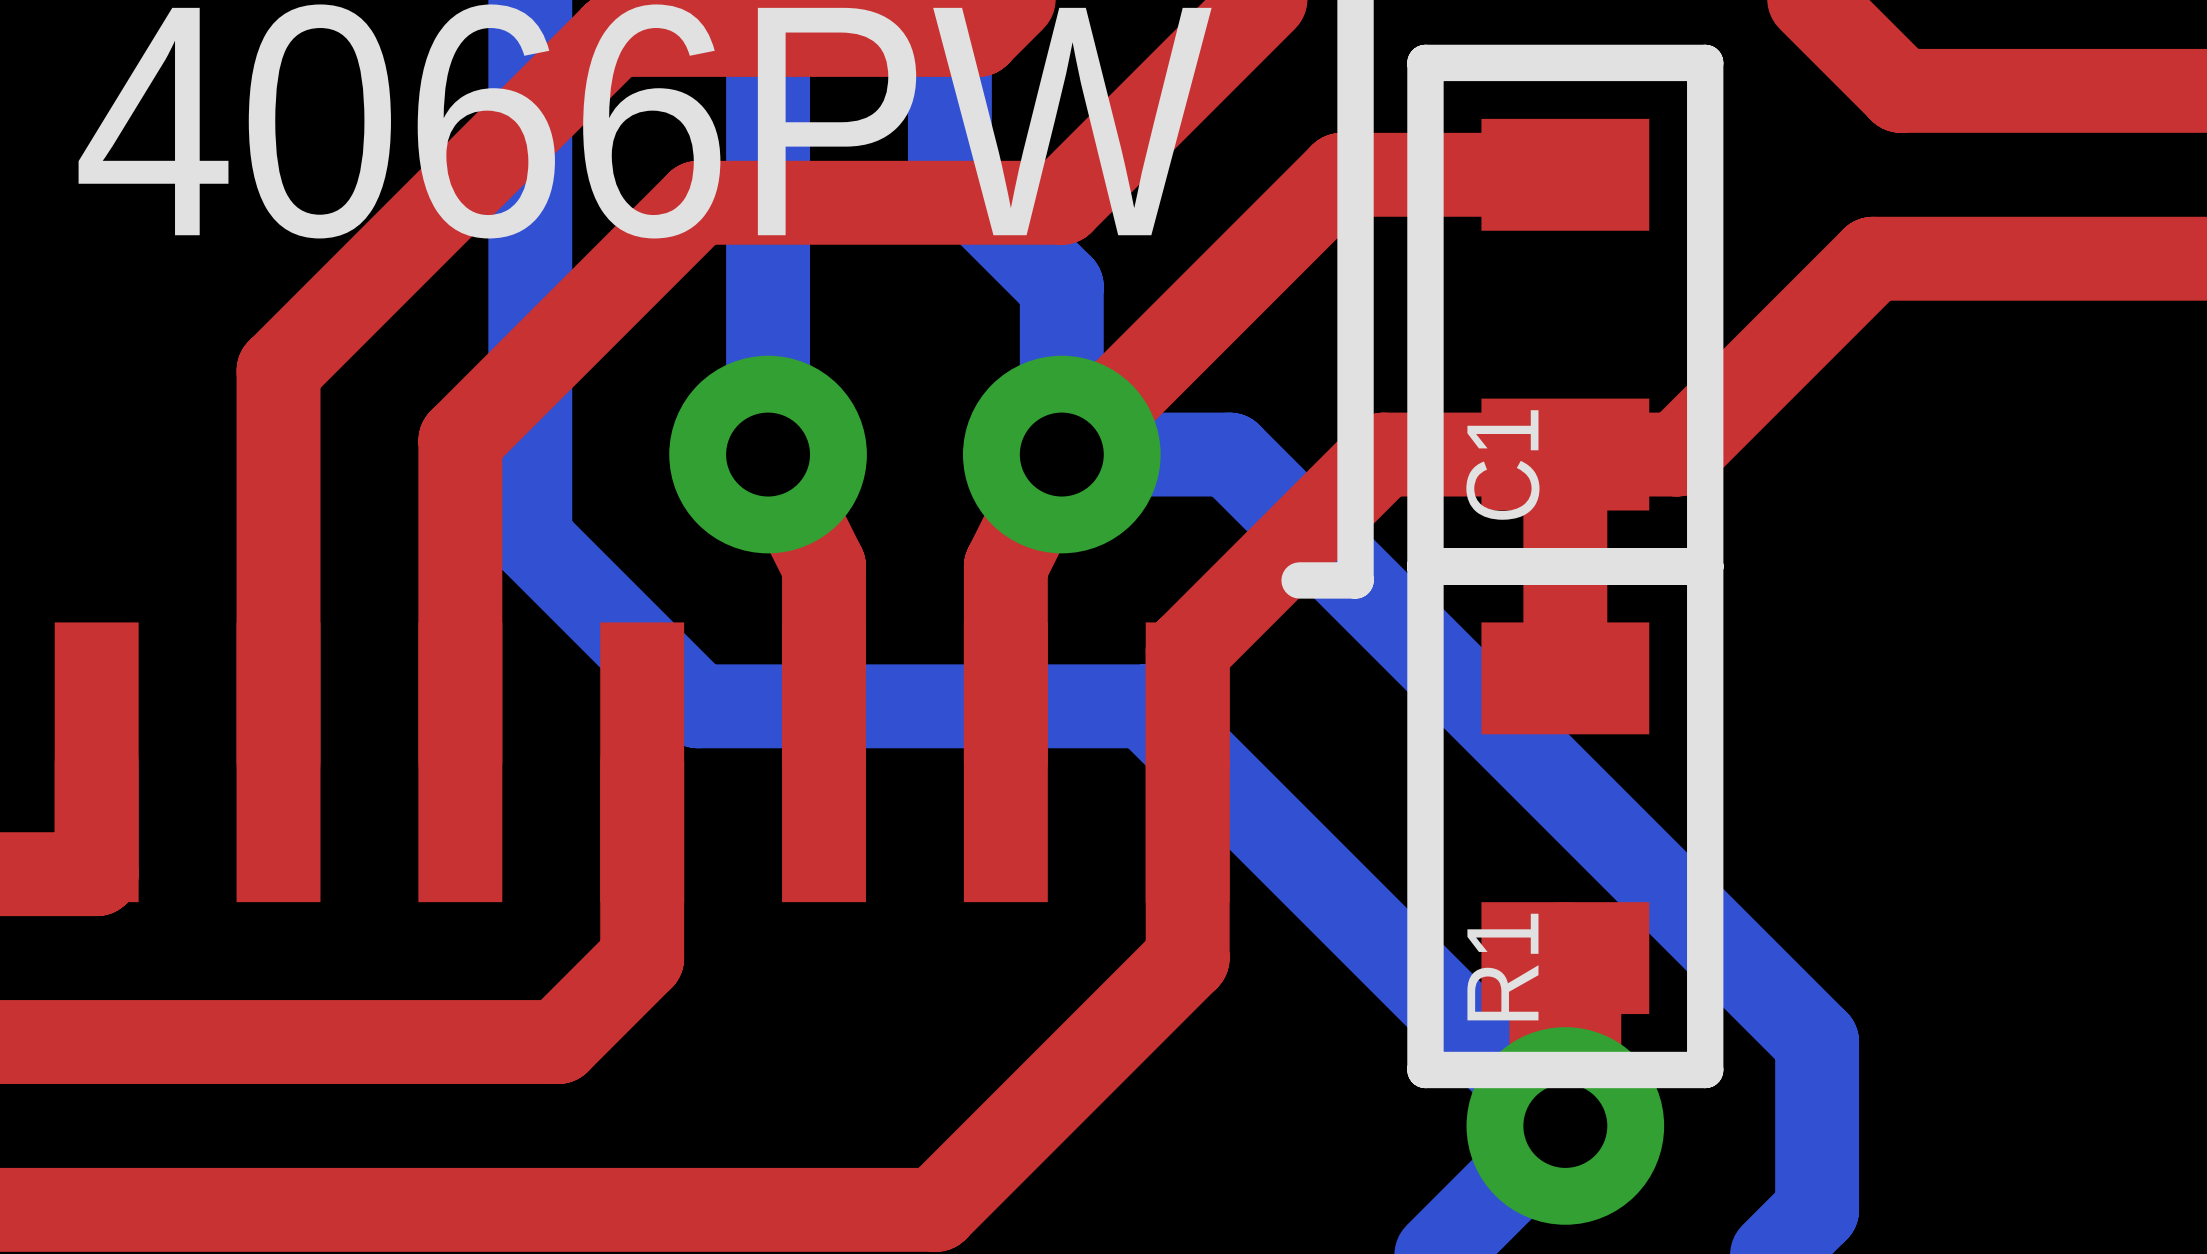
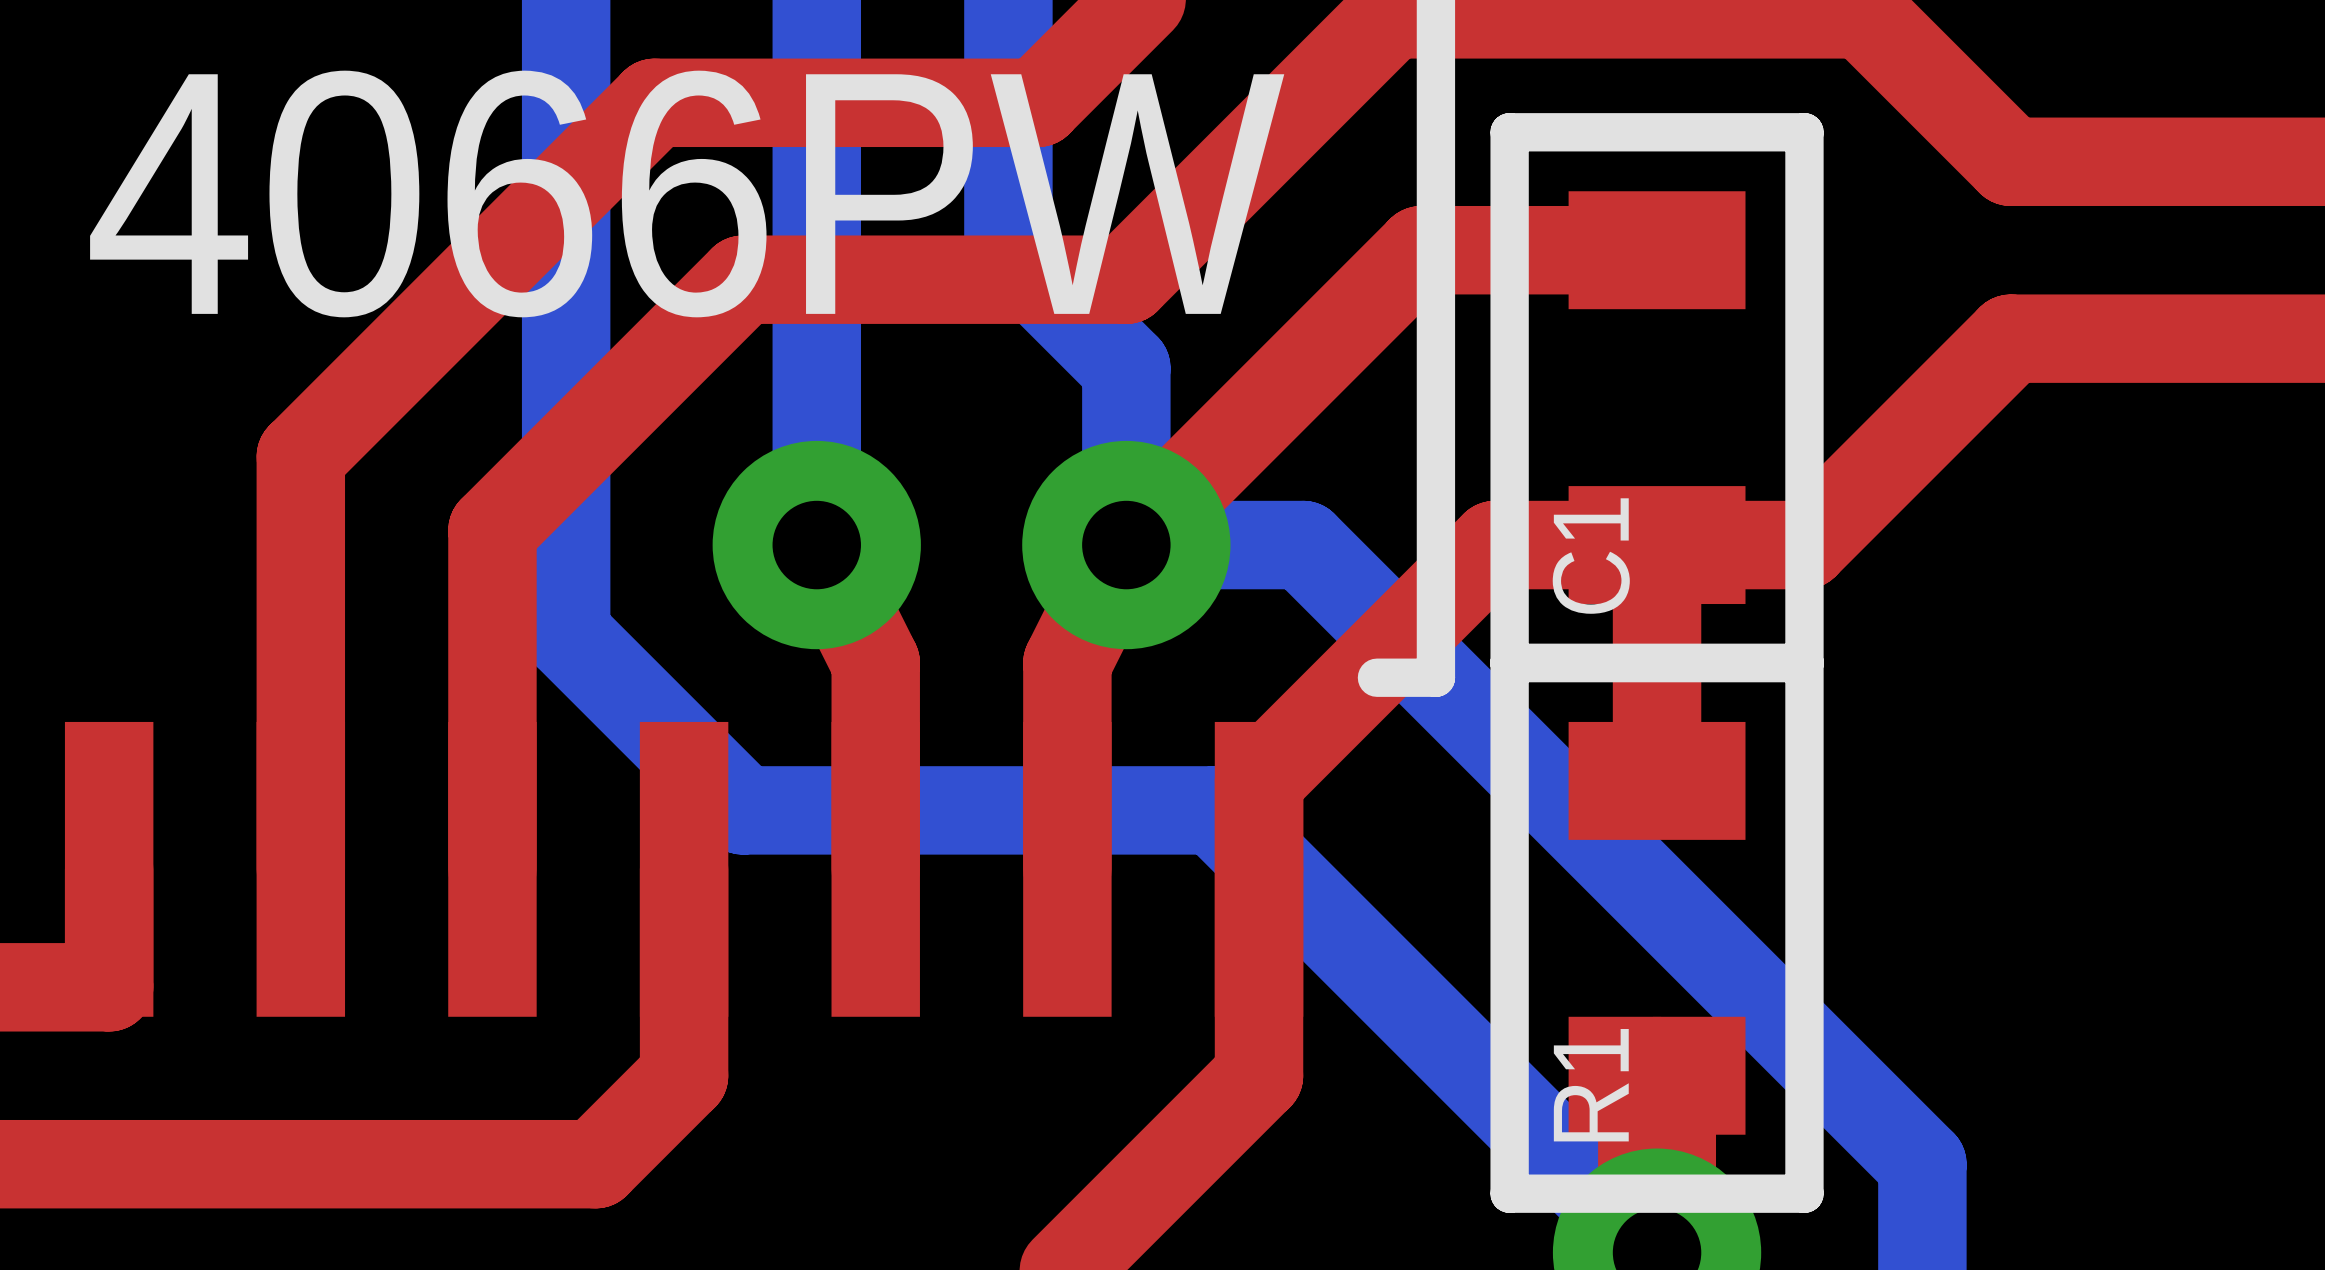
top track: (1901, 258) (1873, 258) (1677, 454) -> (2010, 338) (1804, 545) (1774, 545)
top track: (1411, 454) (1383, 454) (1187, 650) (1187, 678) -> (1494, 545) (1259, 780)

